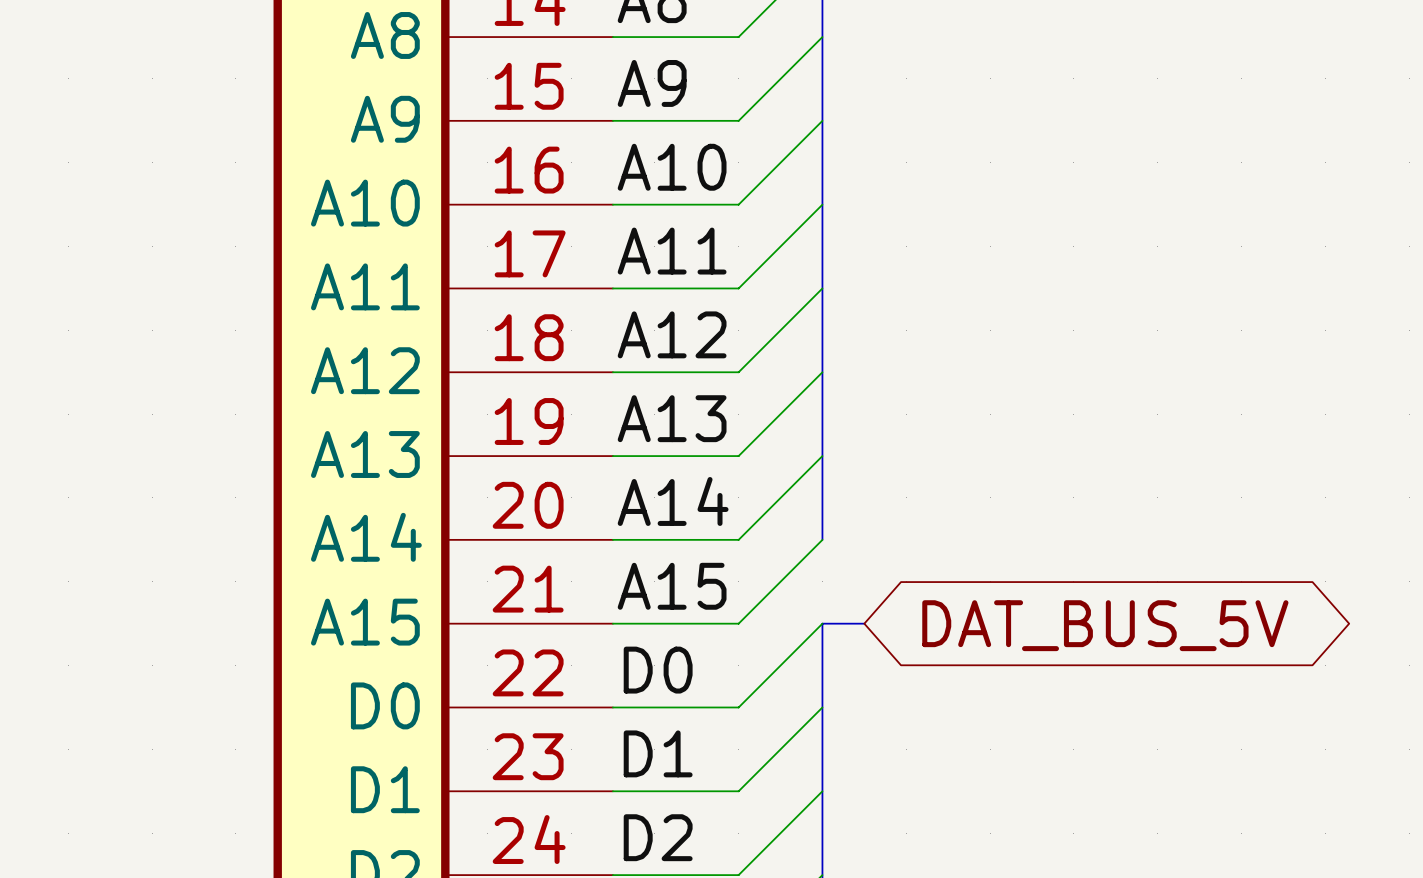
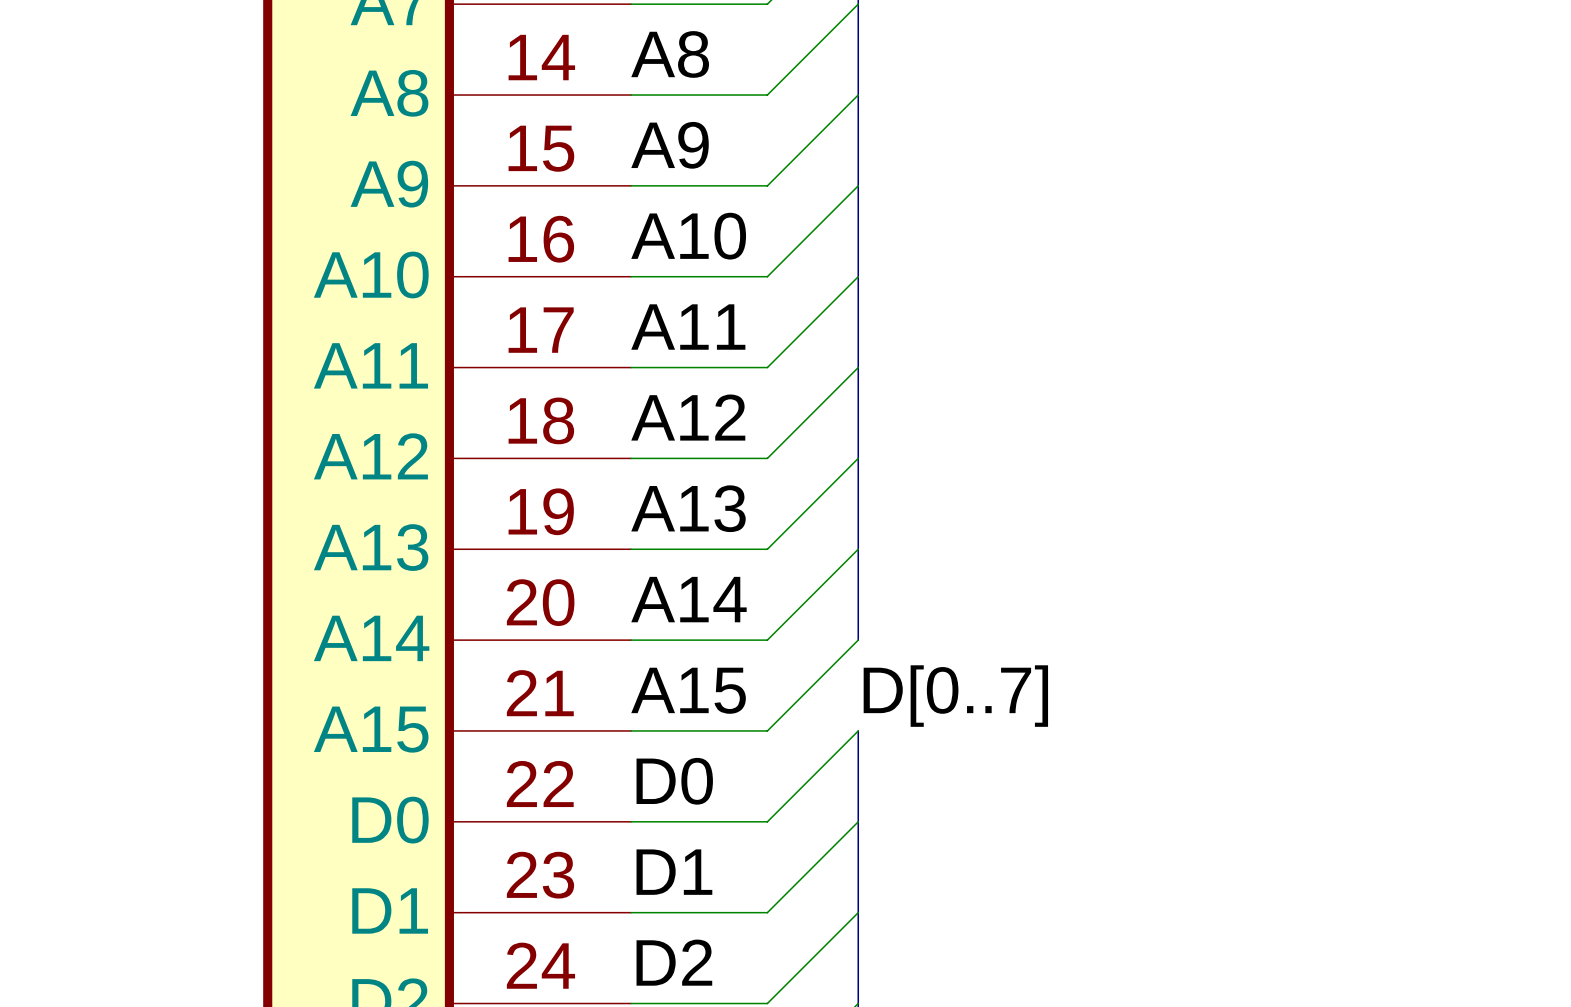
label: none -> D[0..7] (955, 696)
bus: (822, 623) (864, 623) -> none
global label: DAT_BUS_5V (1105, 625) -> none

